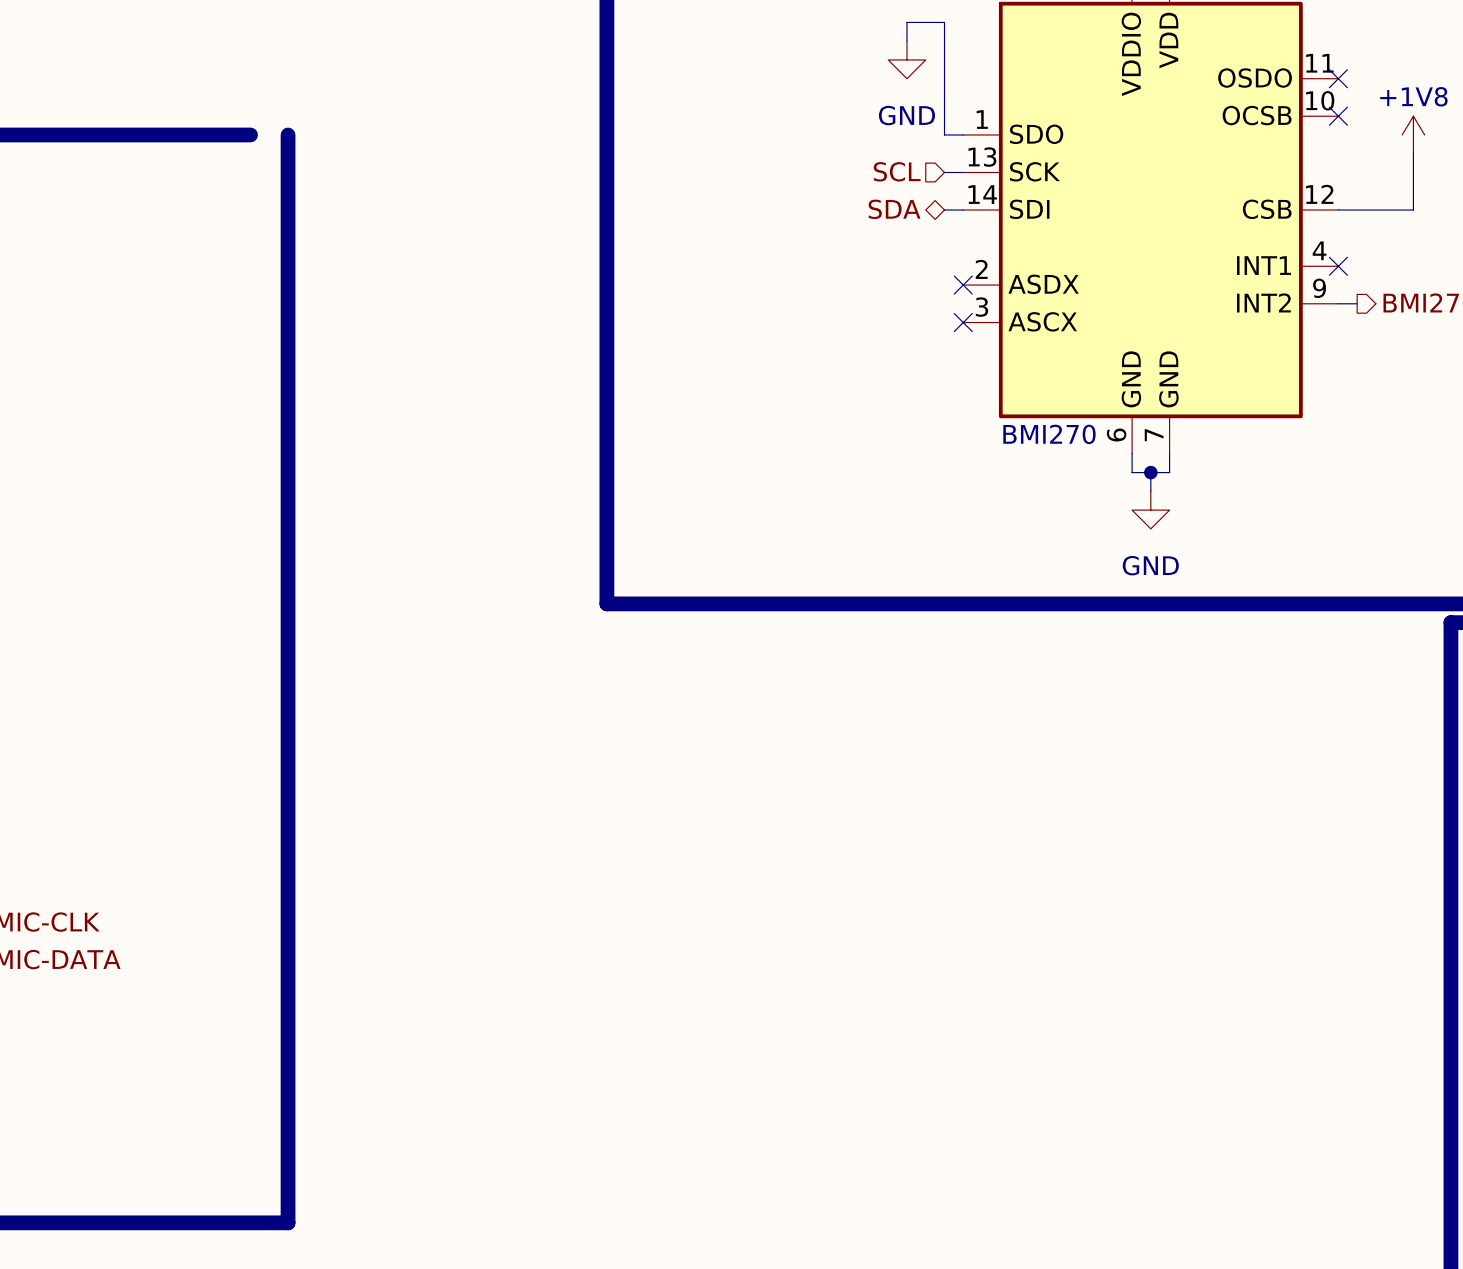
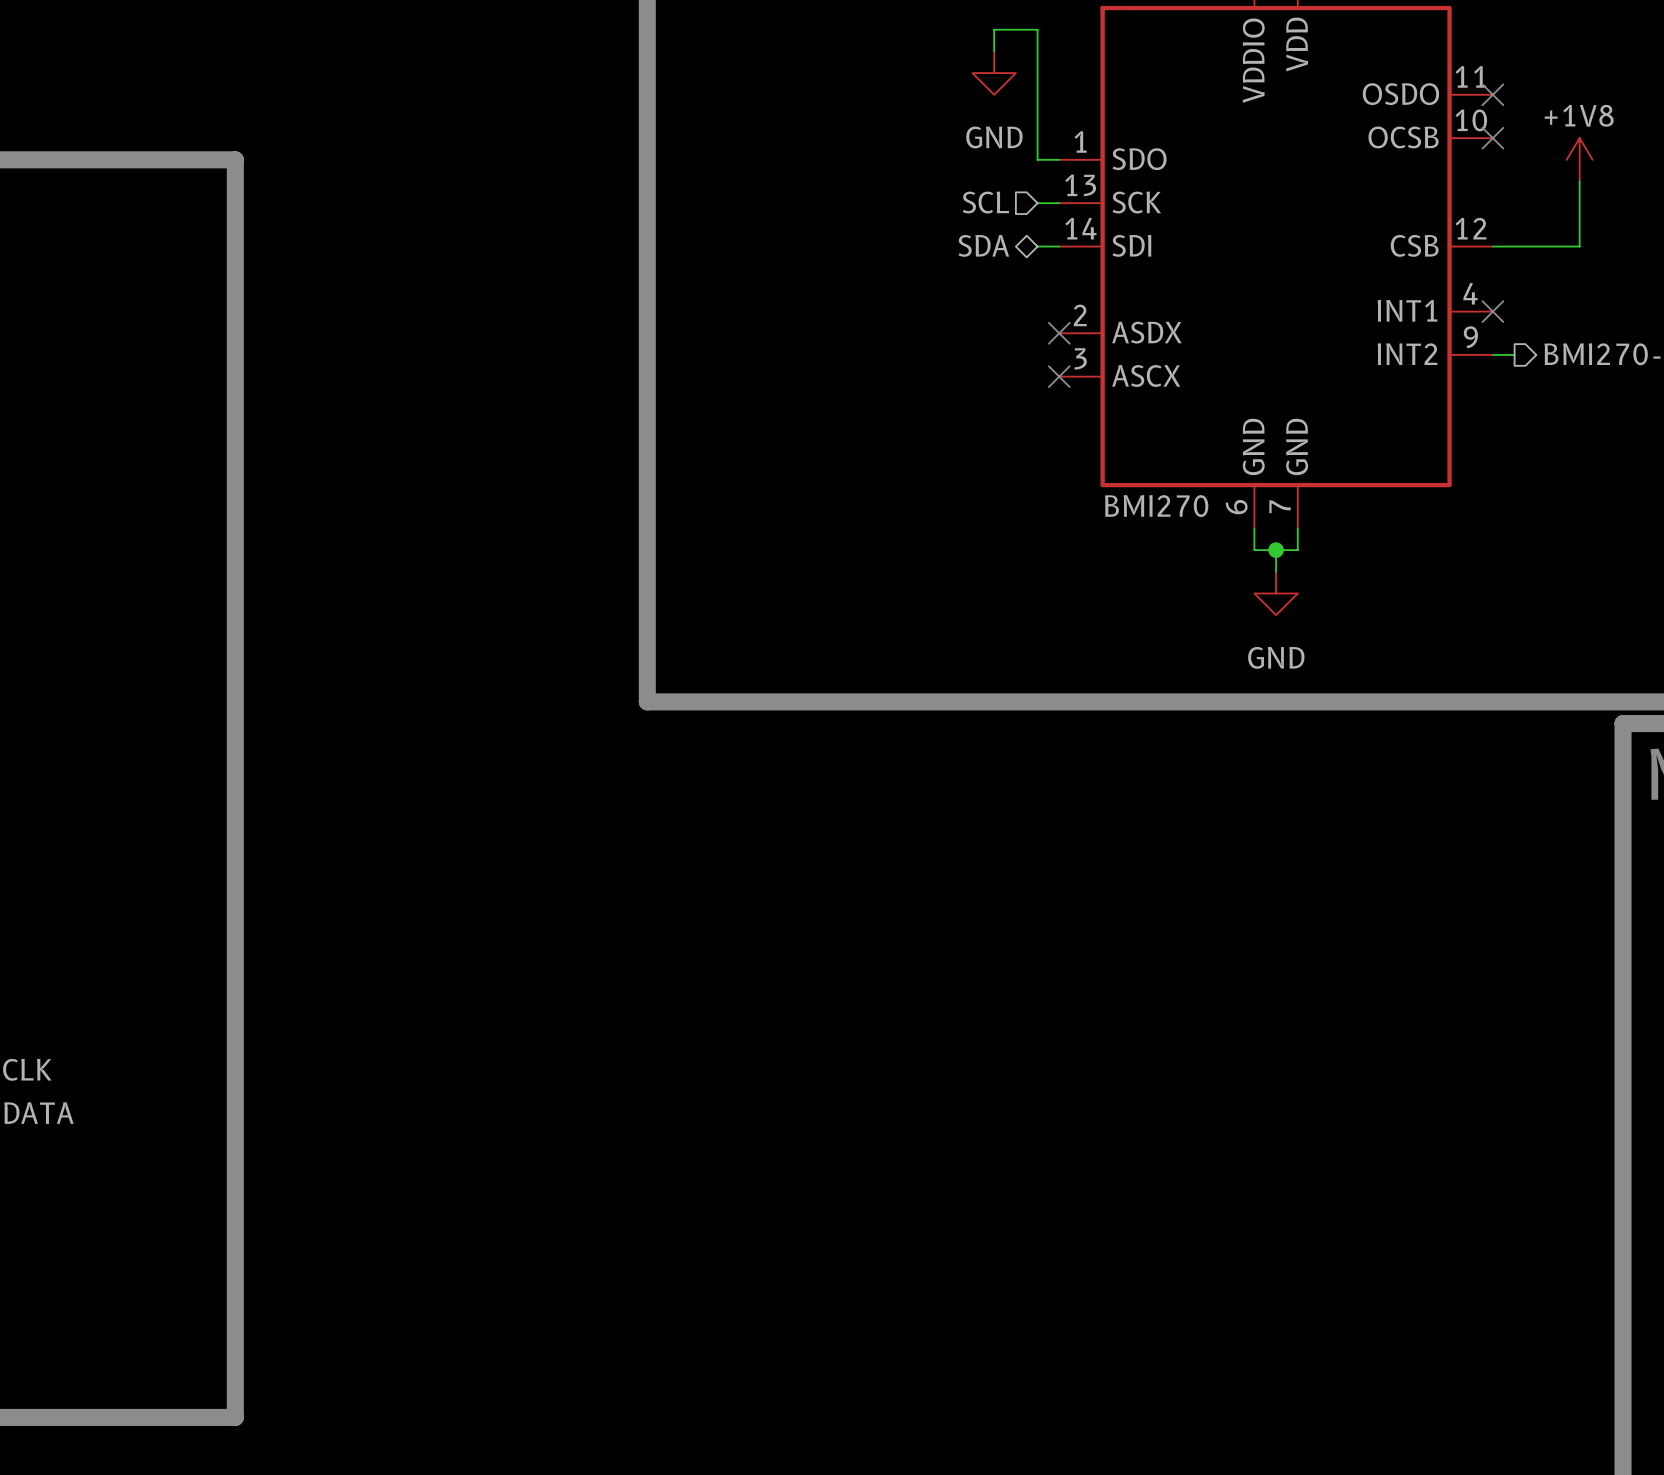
line: (288, 134) (288, 1222) (250, 1222) -> (235, 159) (235, 1417)

